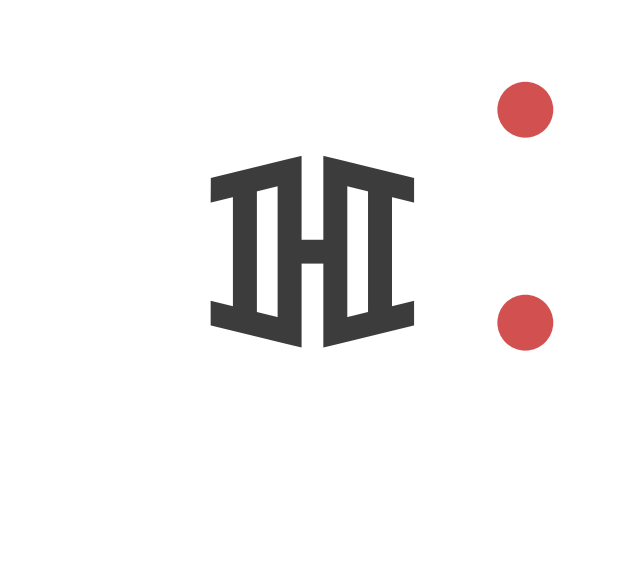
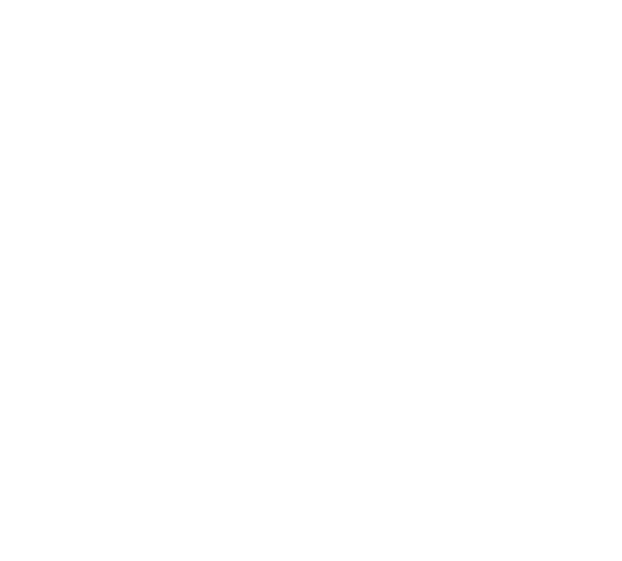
part: (525, 109) -> none
drawing: [210, 155, 415, 348] -> none
part: (525, 322) -> none

